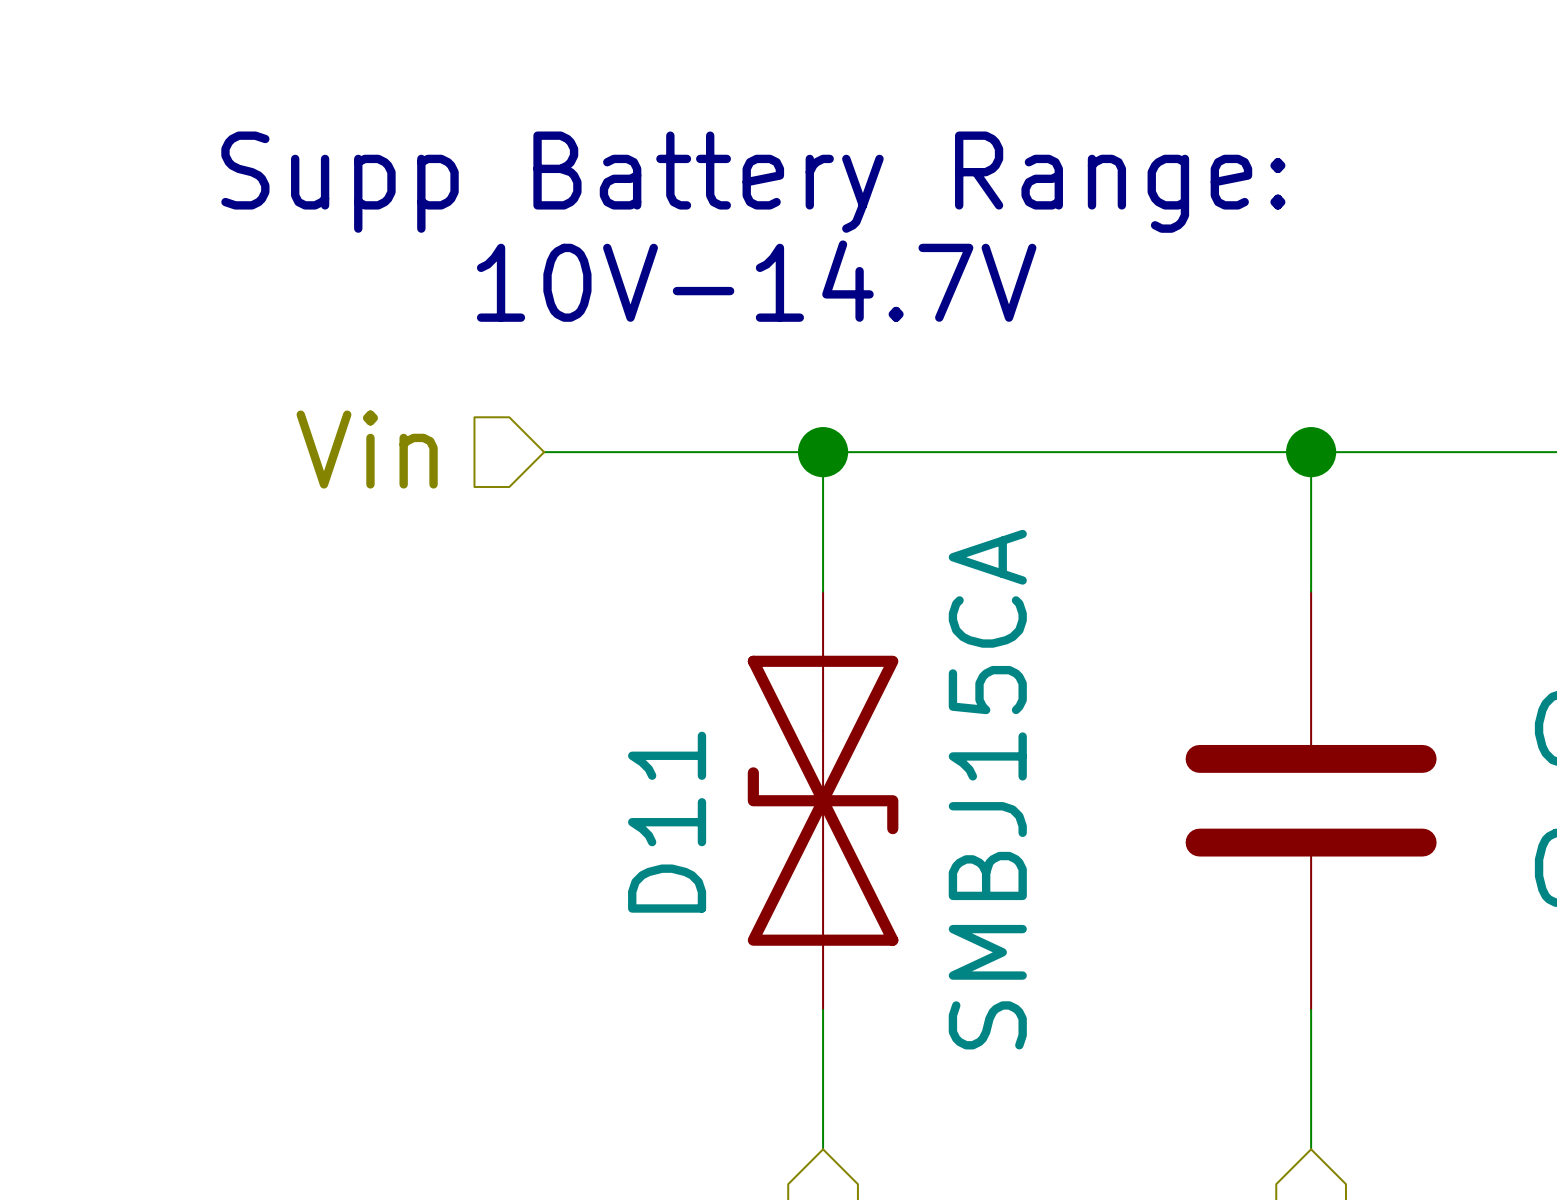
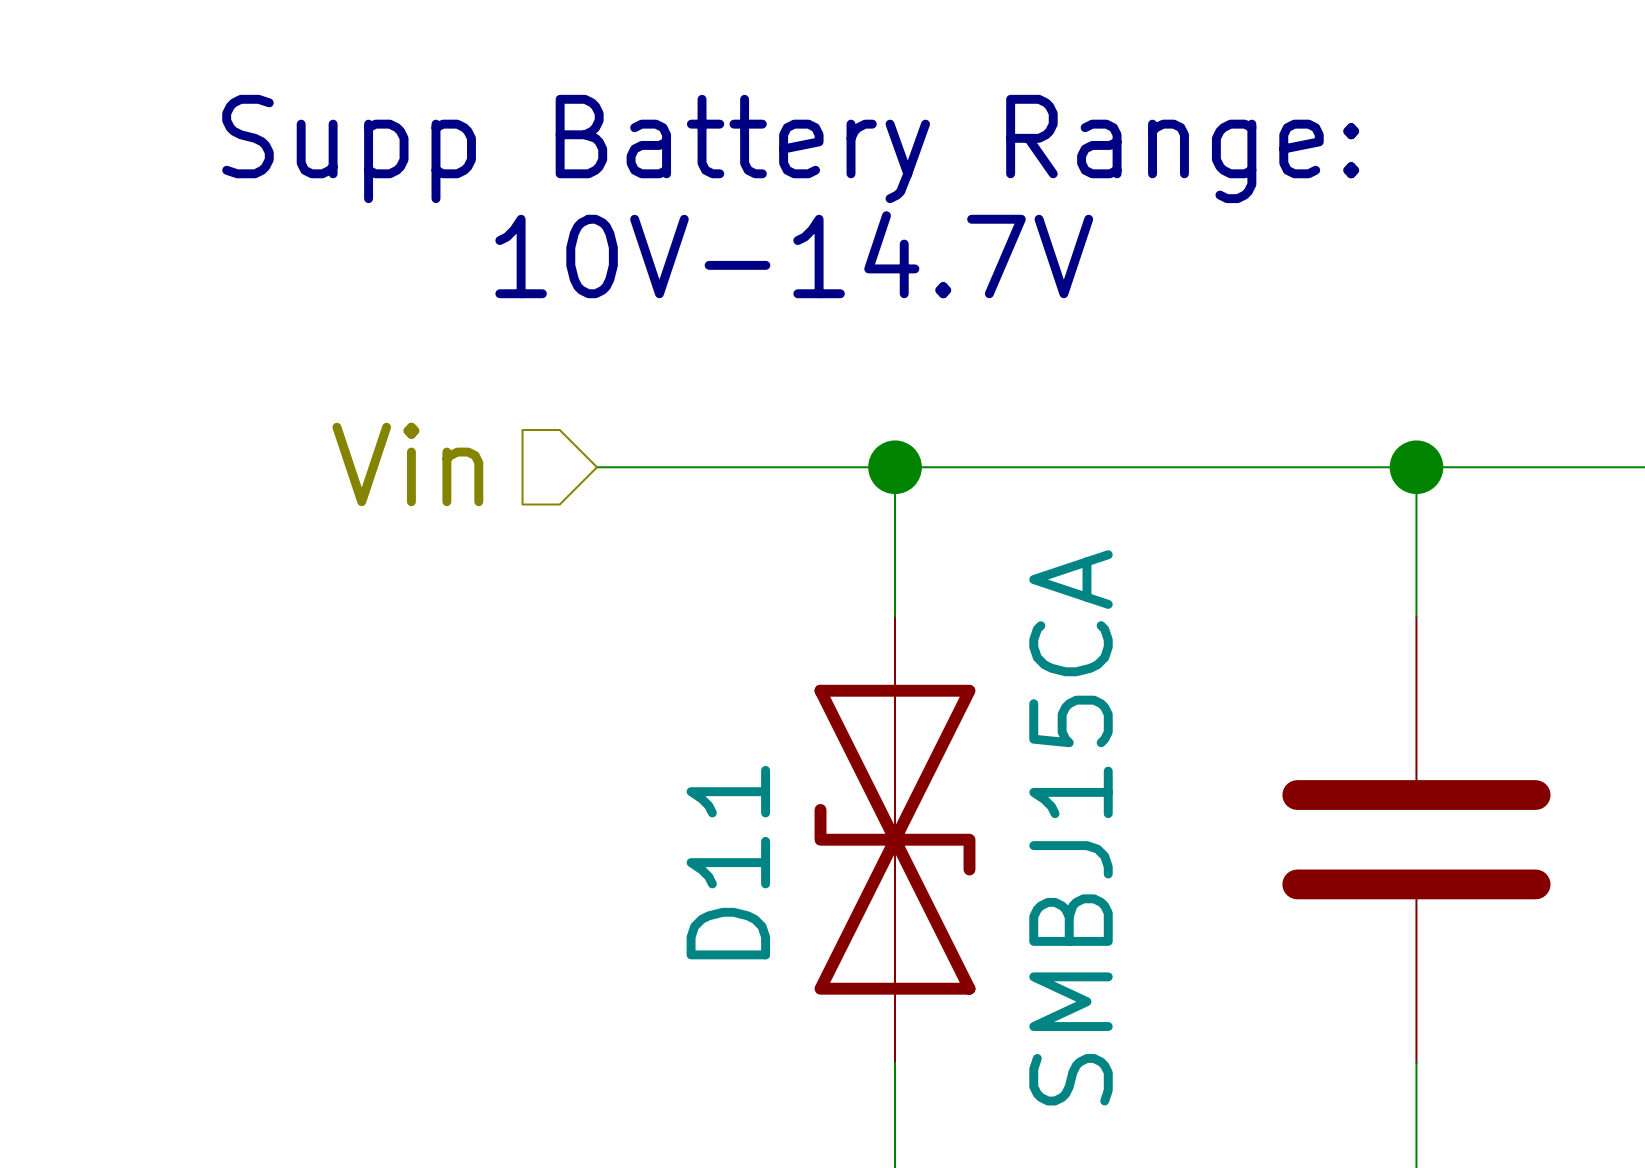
text position: Supp Battery Range: (753, 182) -> Supp Battery Range: (790, 148)
text position: 10V-14.7V (756, 281) -> 10V-14.7V (794, 254)

